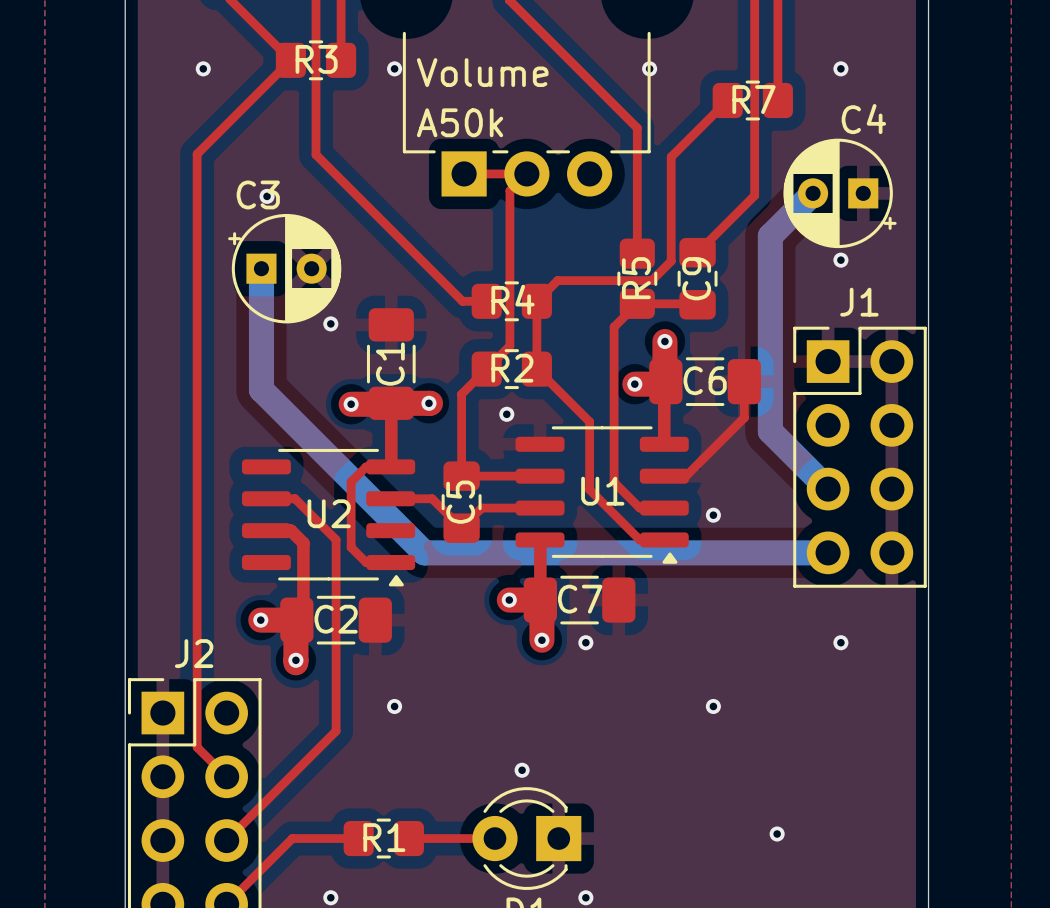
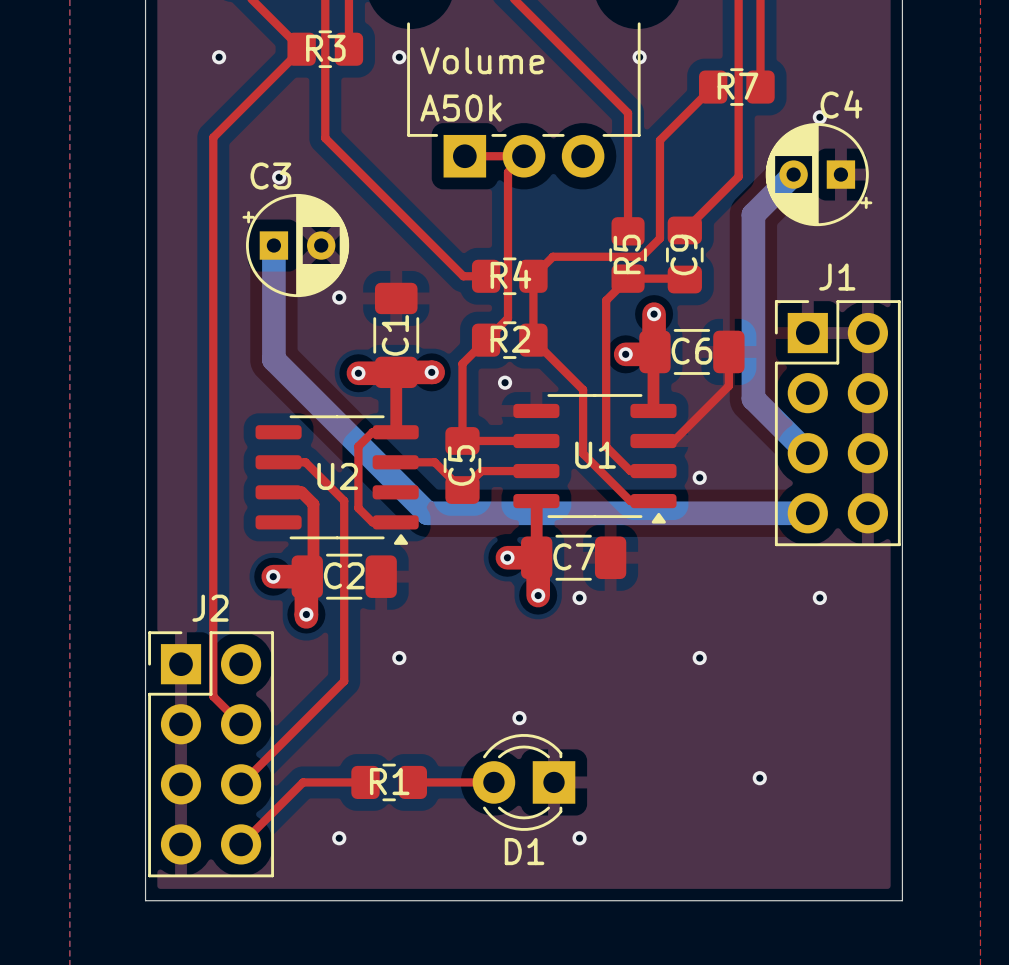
via: (840, 68) -> none
via: none -> (819, 117)
via: (840, 260) -> none

